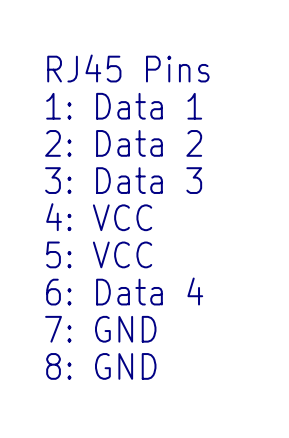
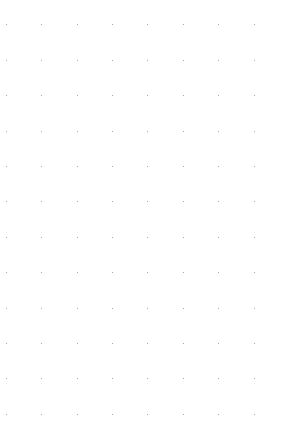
text: RJ45 Pins (128, 68) -> none
text: 1: Data 1 (124, 106) -> none
text: 2: Data 2 (123, 143) -> none
text: 3: Data 3 (123, 180) -> none
text: 4: VCC (99, 217) -> none
text: 5: VCC (99, 254) -> none
text: 6: Data 4 (124, 291) -> none
text: 7: GND (100, 329) -> none
text: 8: GND (101, 366) -> none

